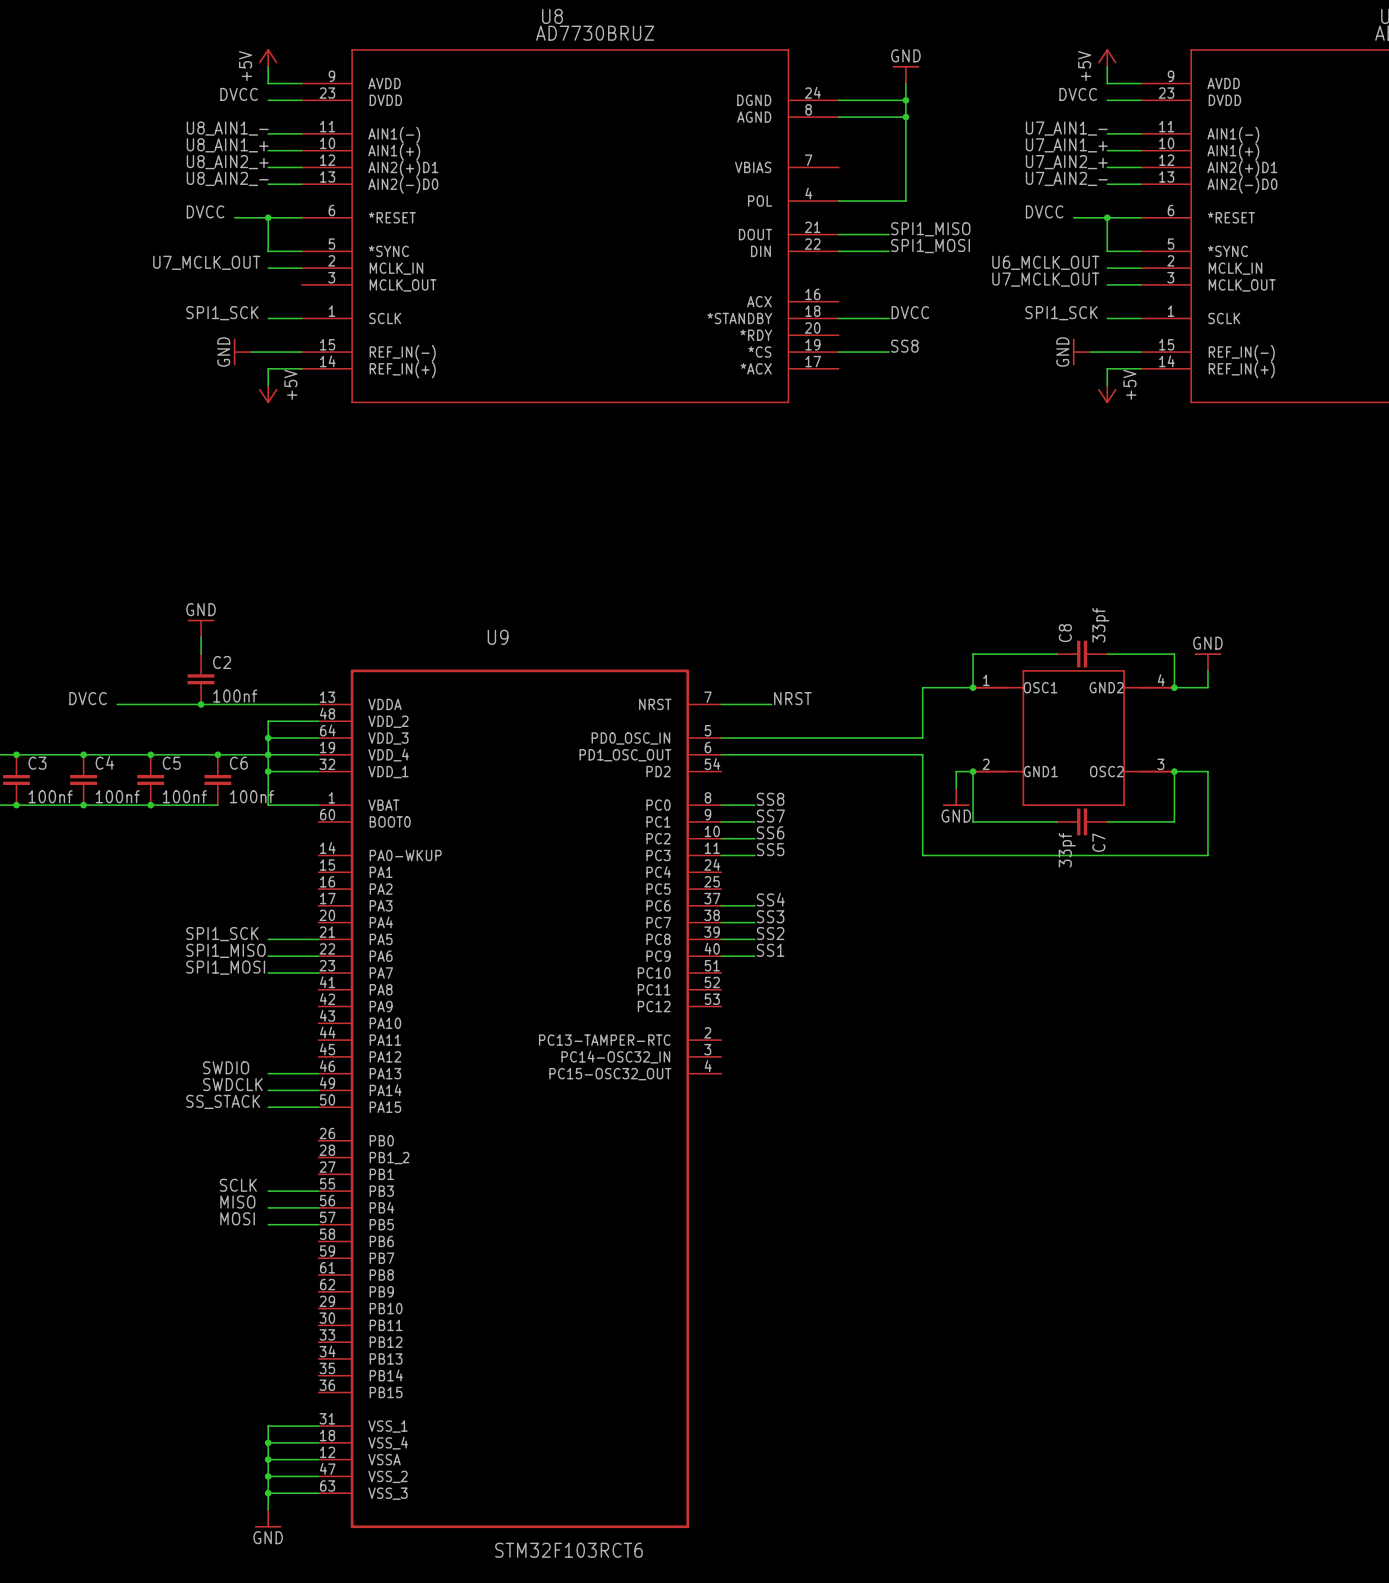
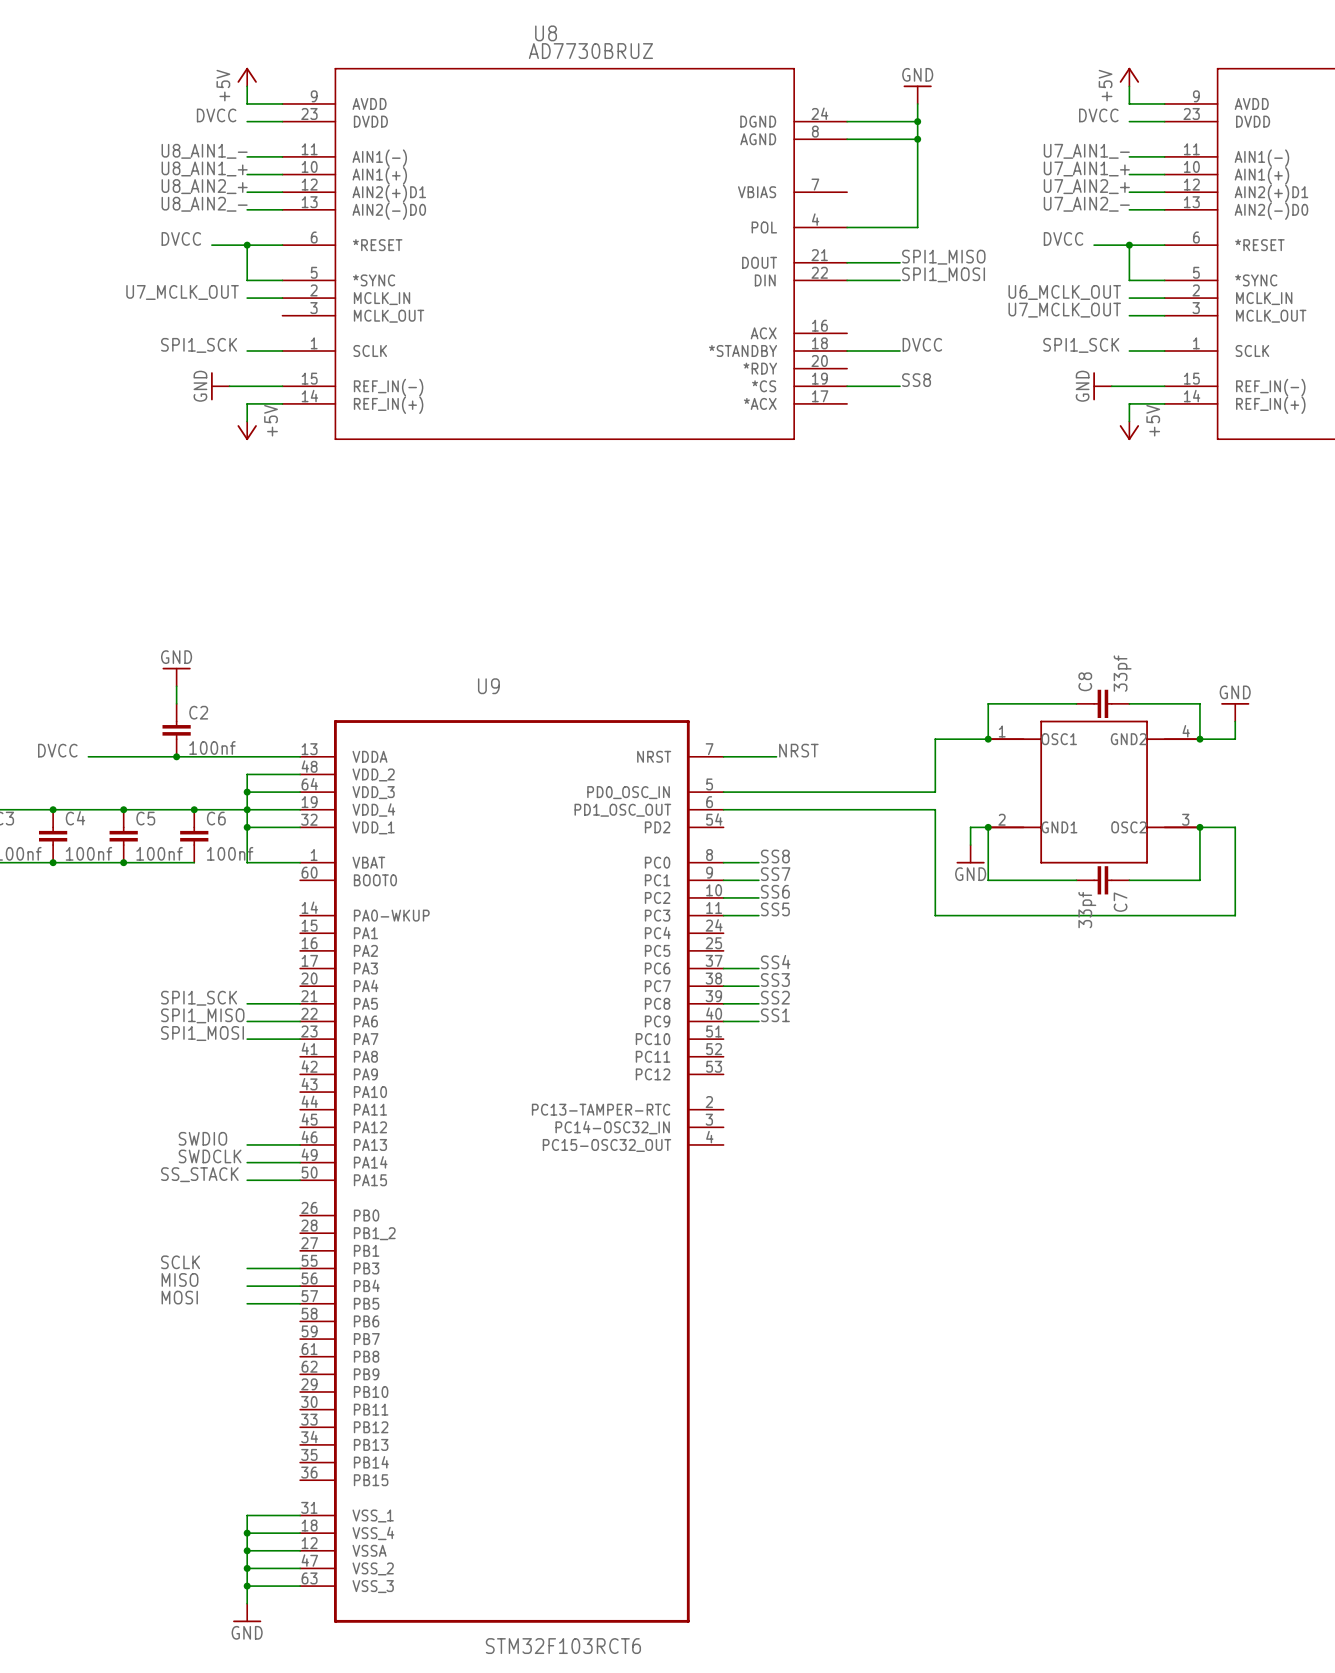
label position: SCLK (238, 1185) -> SCLK (180, 1262)
label position: MISO (237, 1202) -> MISO (180, 1279)
label position: MOSI (237, 1218) -> MOSI (179, 1297)

